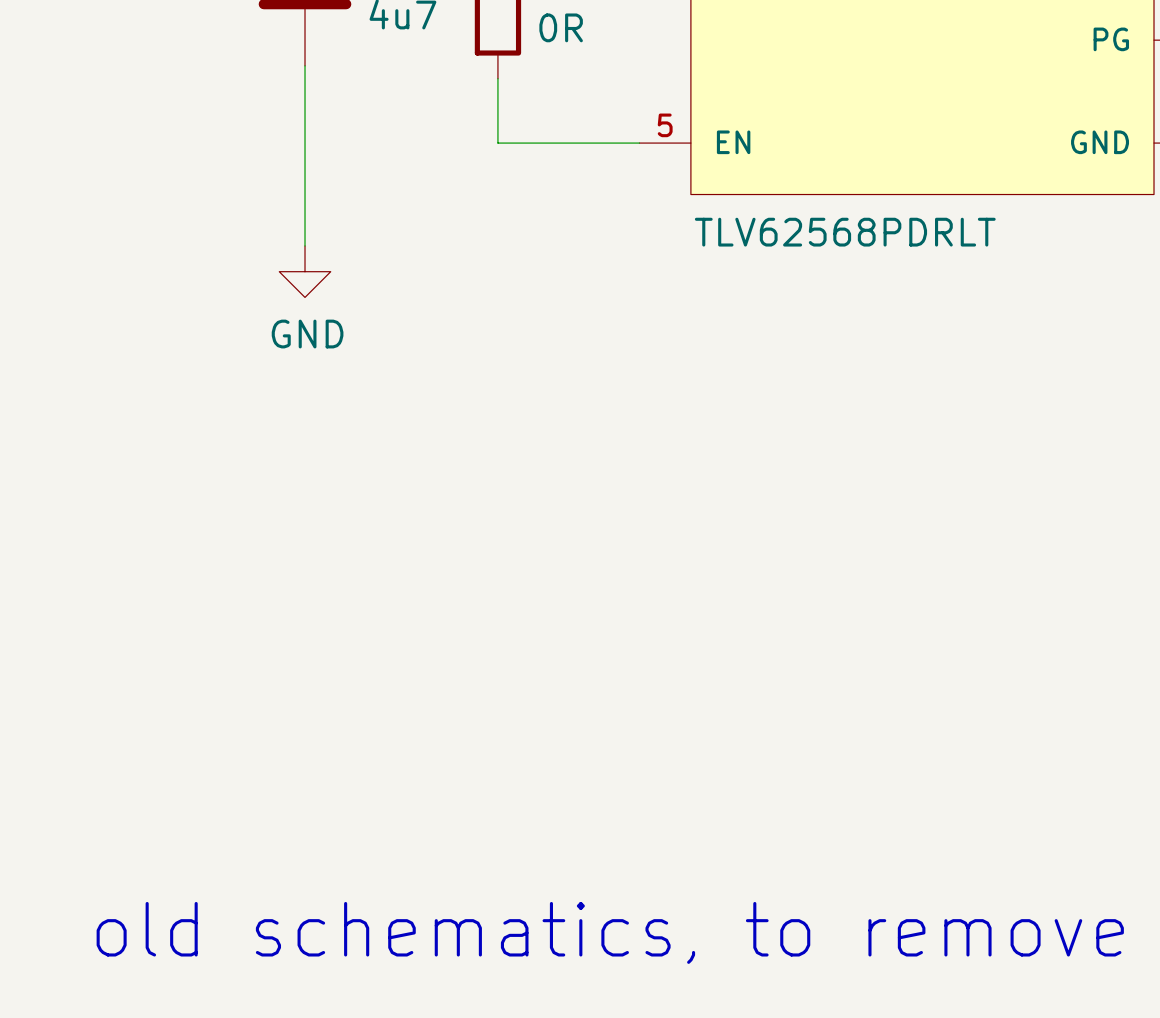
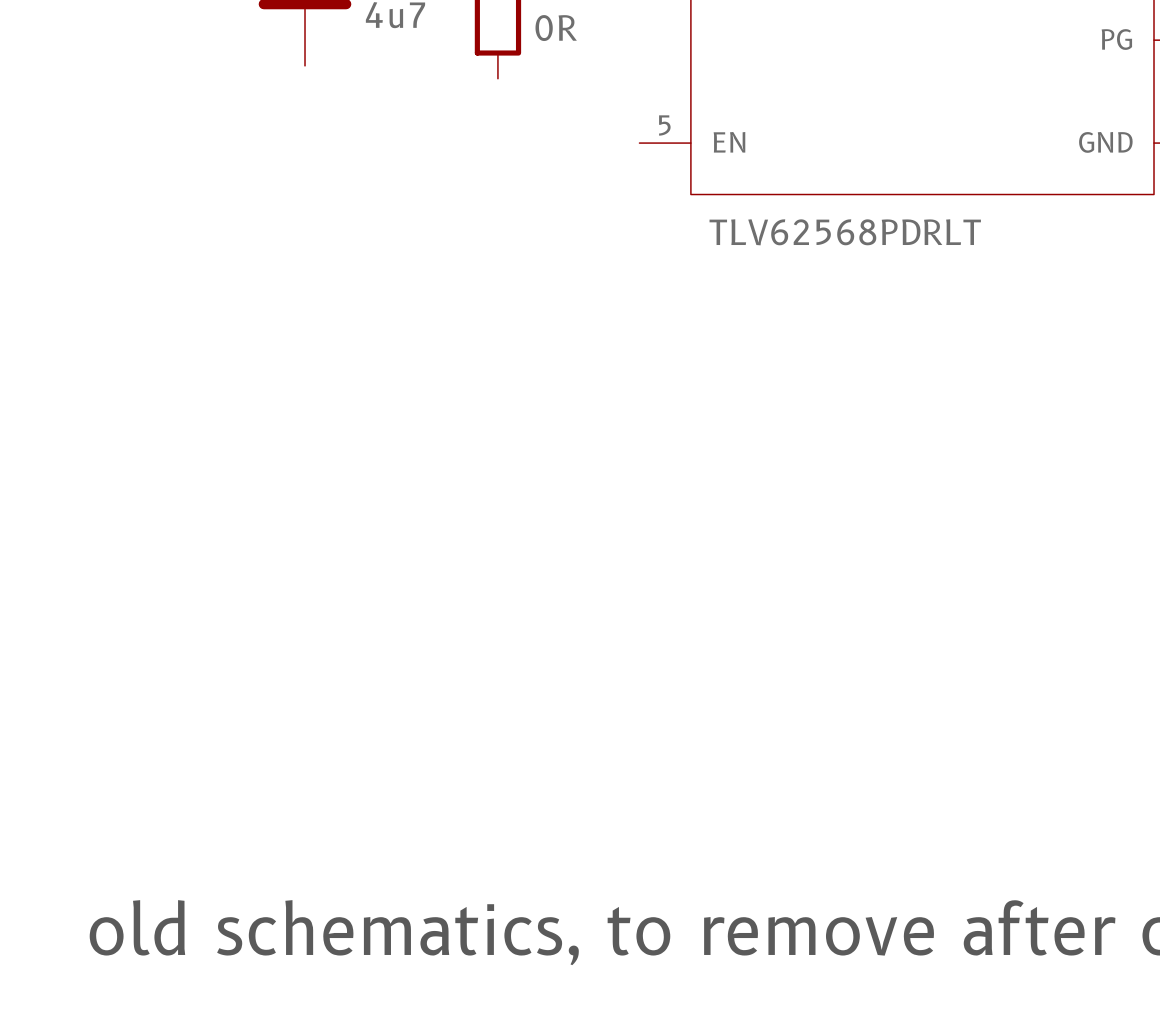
wire: (305, 65) (305, 245) -> none
wire: (497, 78) (497, 143) (639, 143) -> none
power symbol: GND (305, 271) -> none

